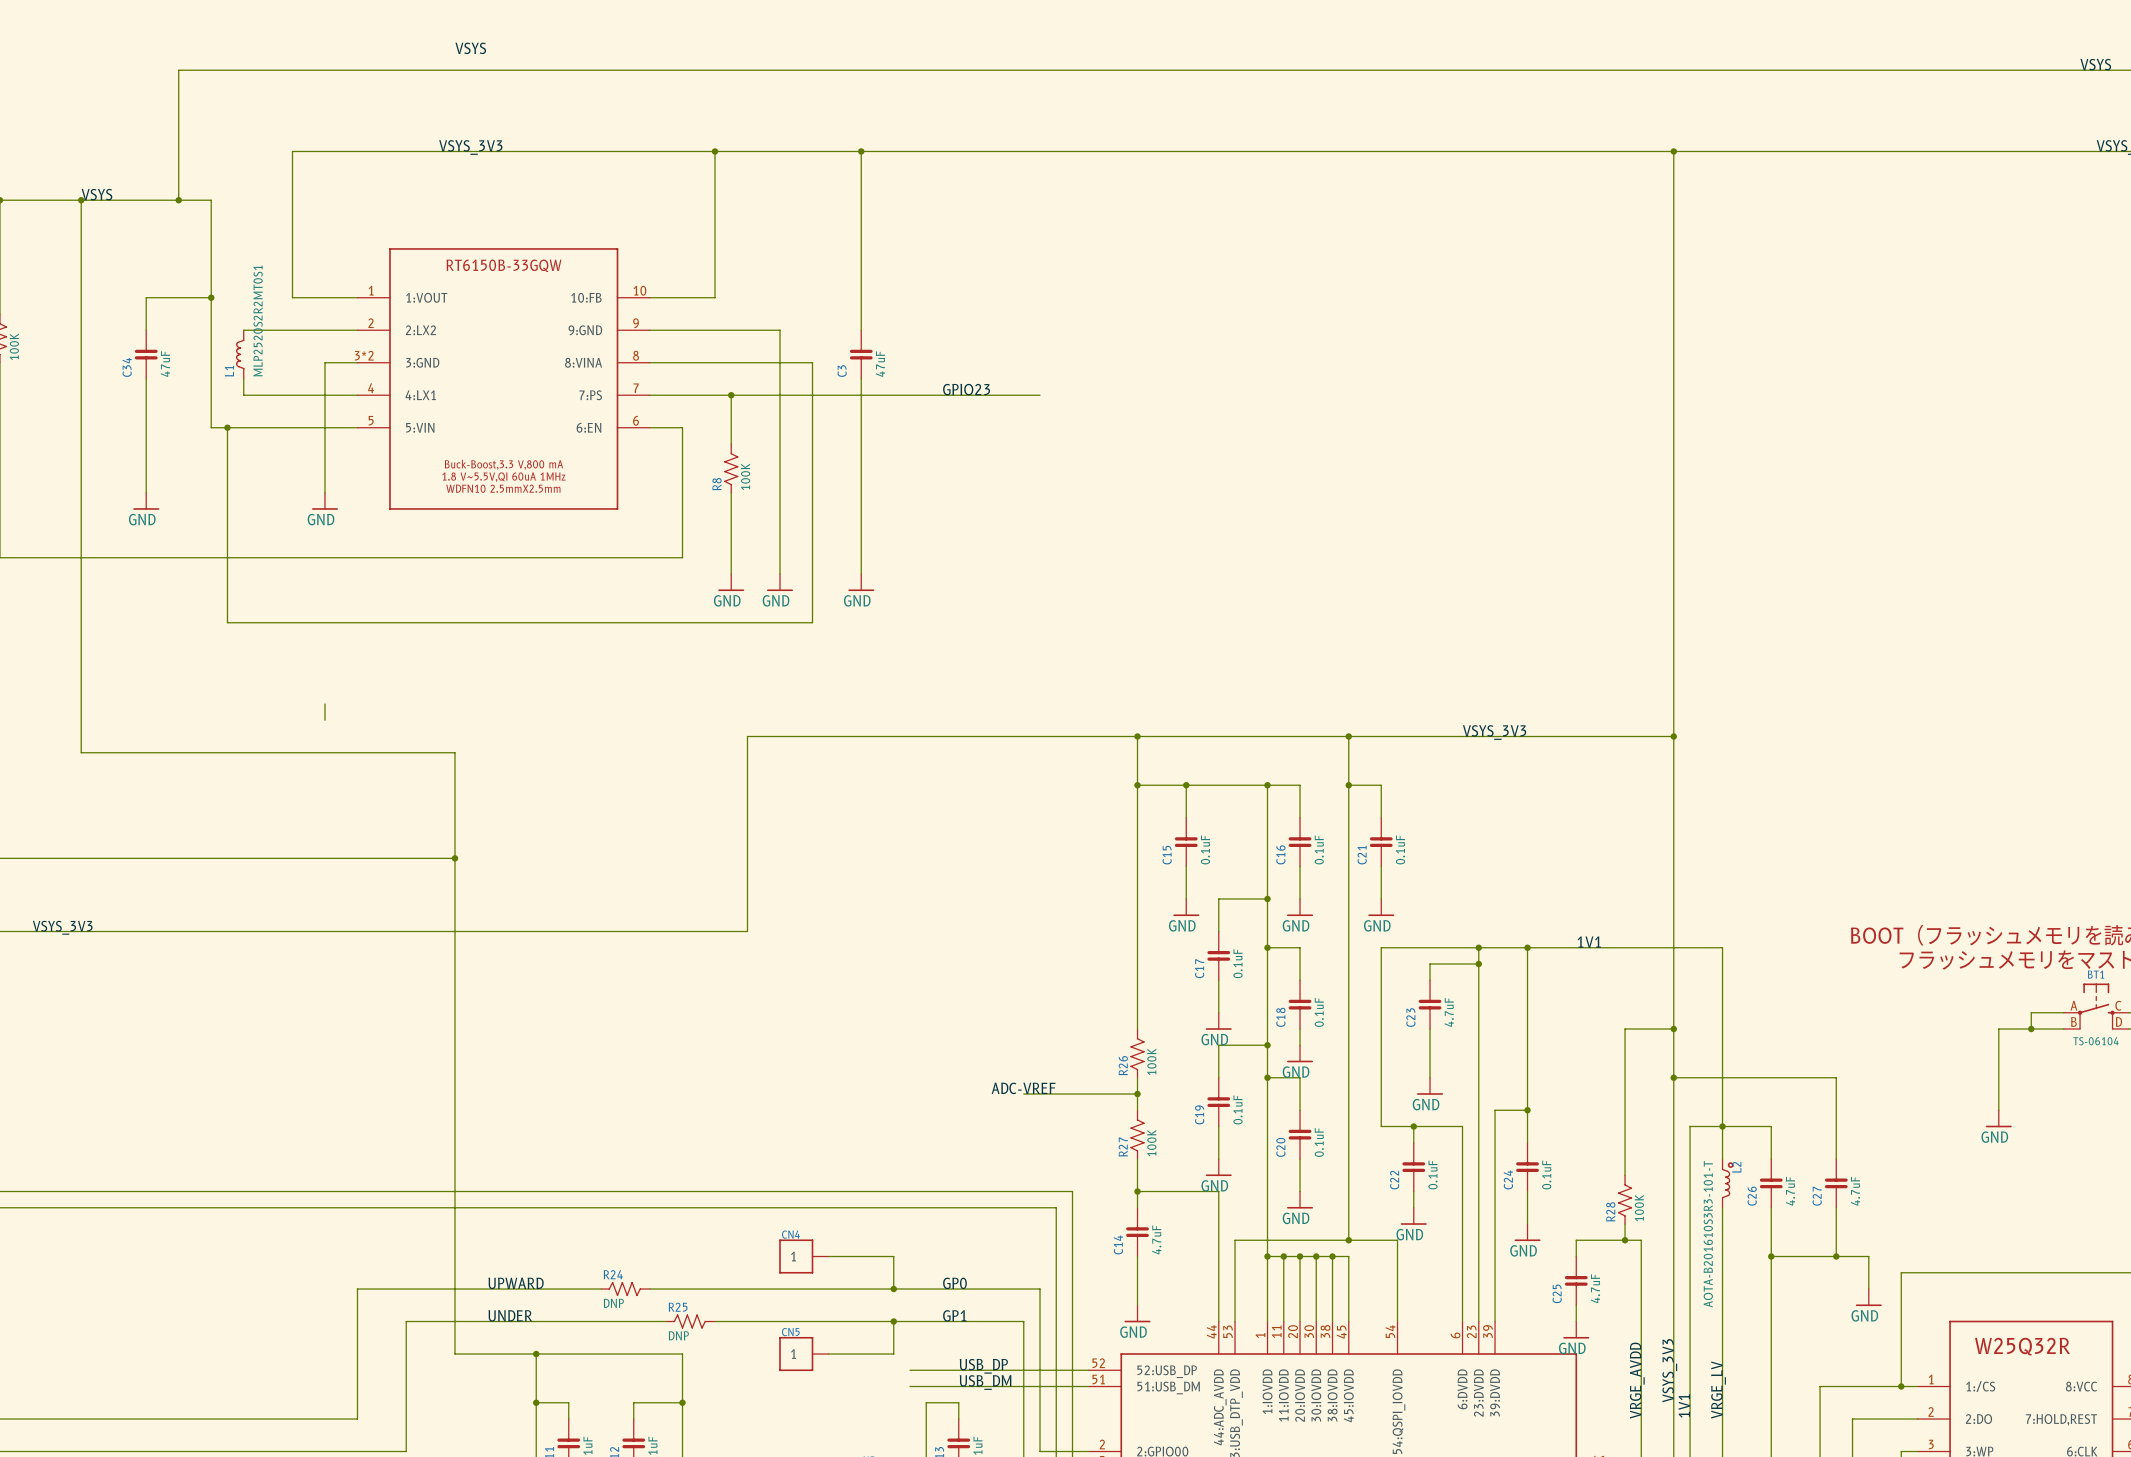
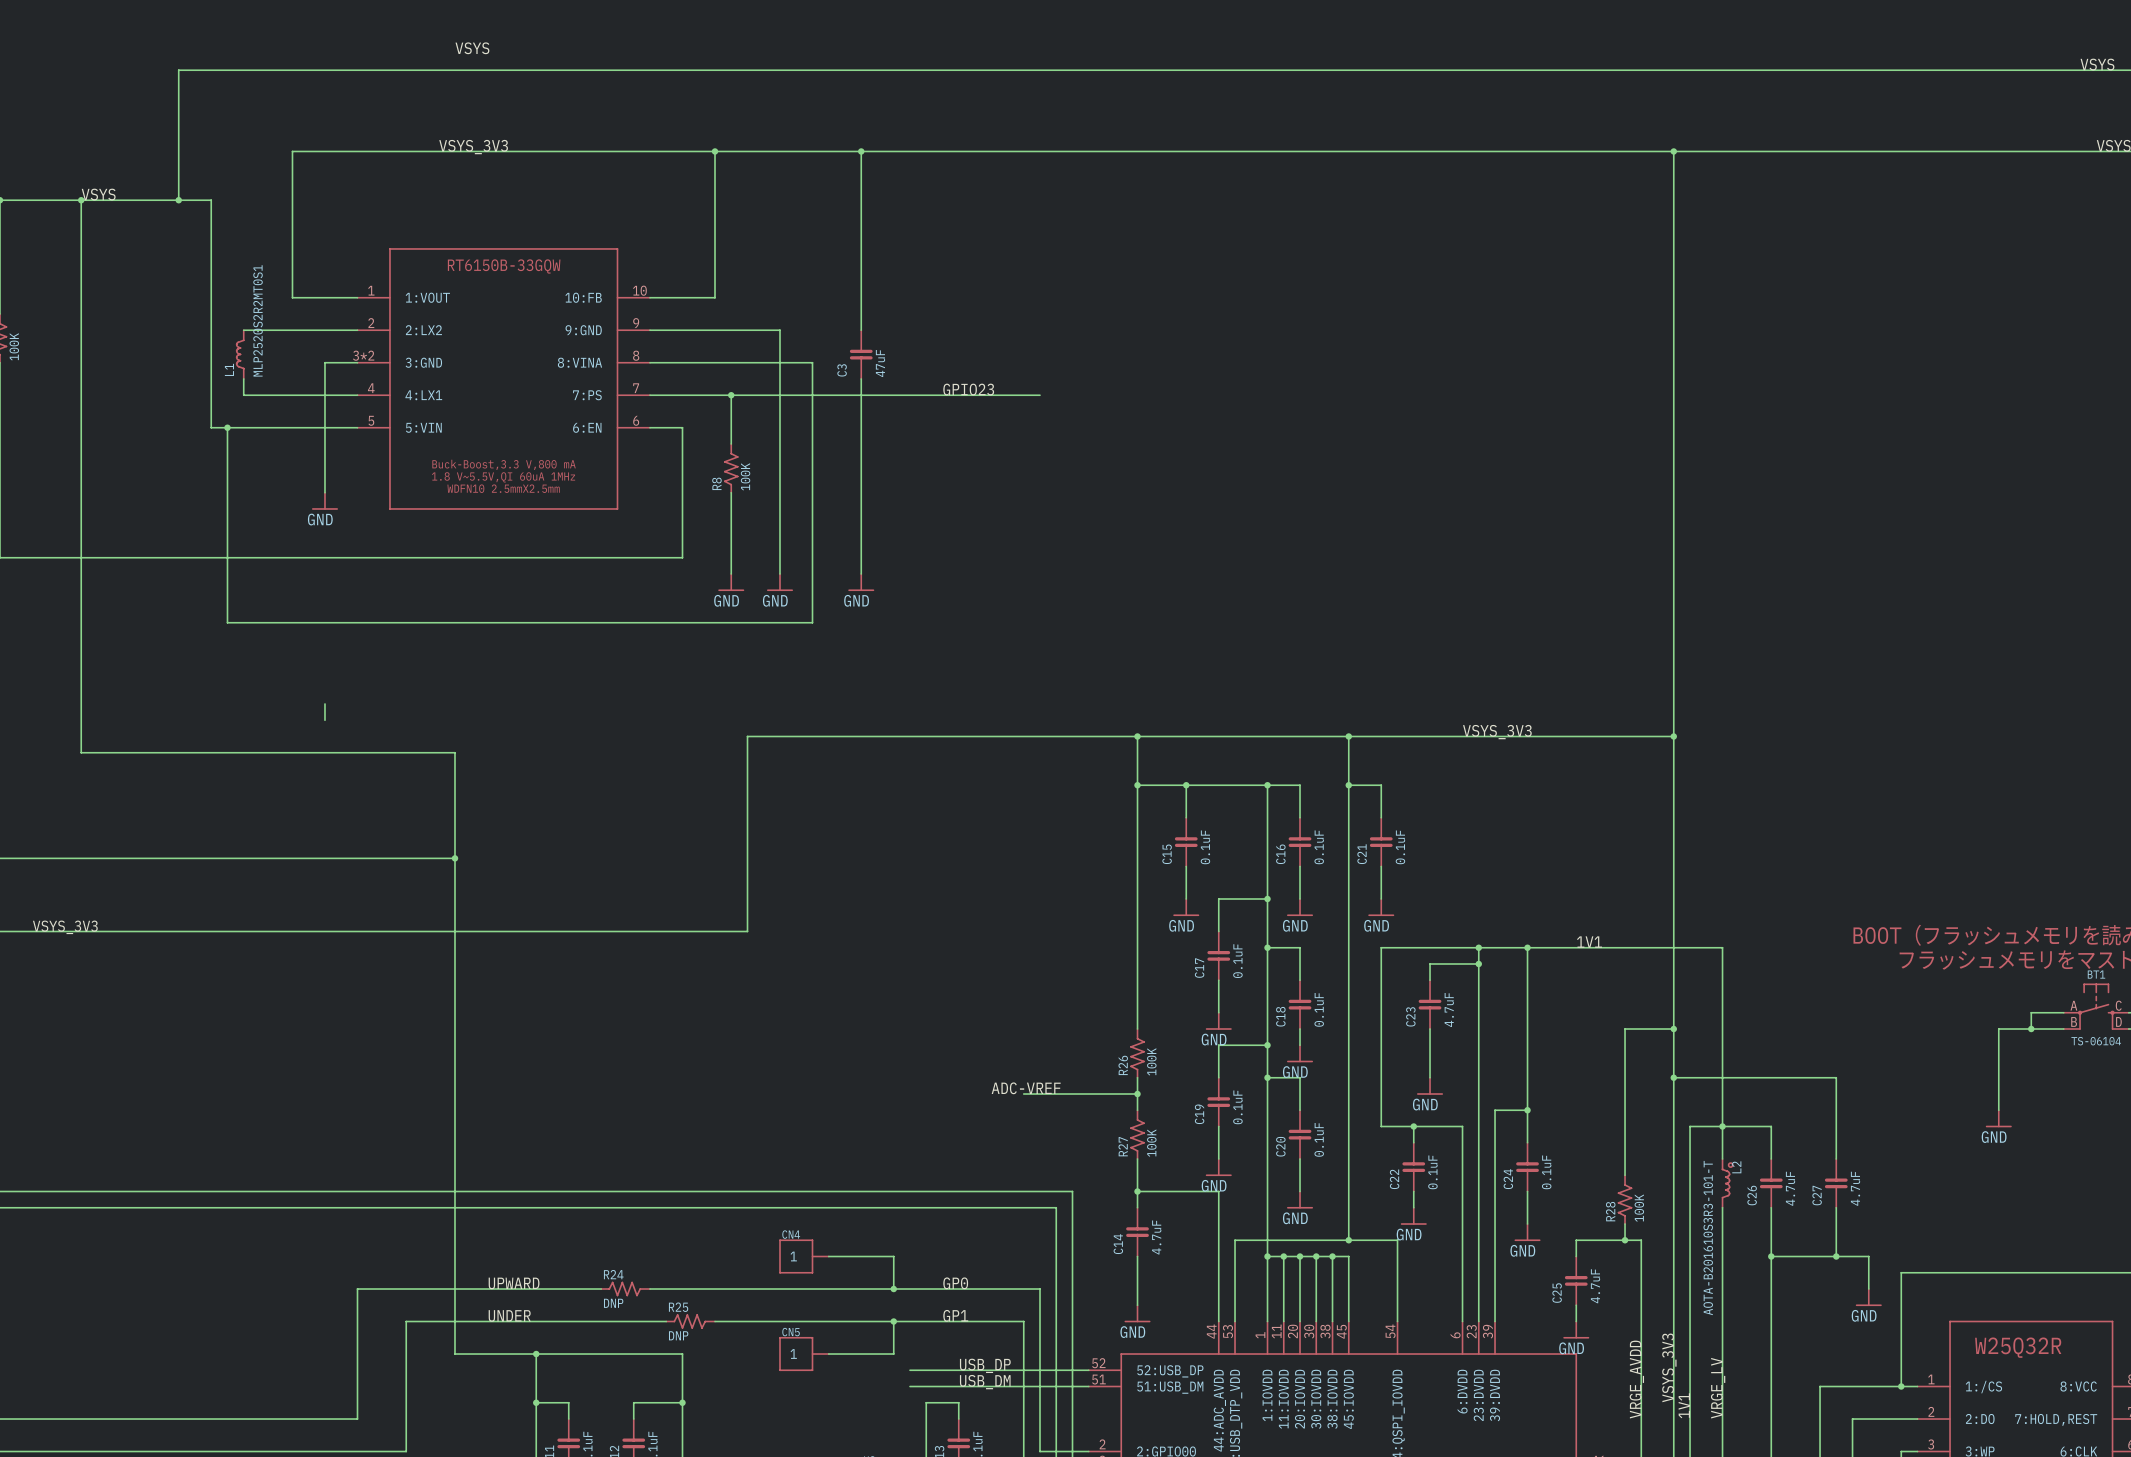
wire: (211, 297) (146, 297) (146, 330) -> none
junction: (211, 297) -> none
C34: 47uF (146, 354) -> none
wire: (146, 378) (146, 492) -> none
power symbol: GND (146, 501) -> none

